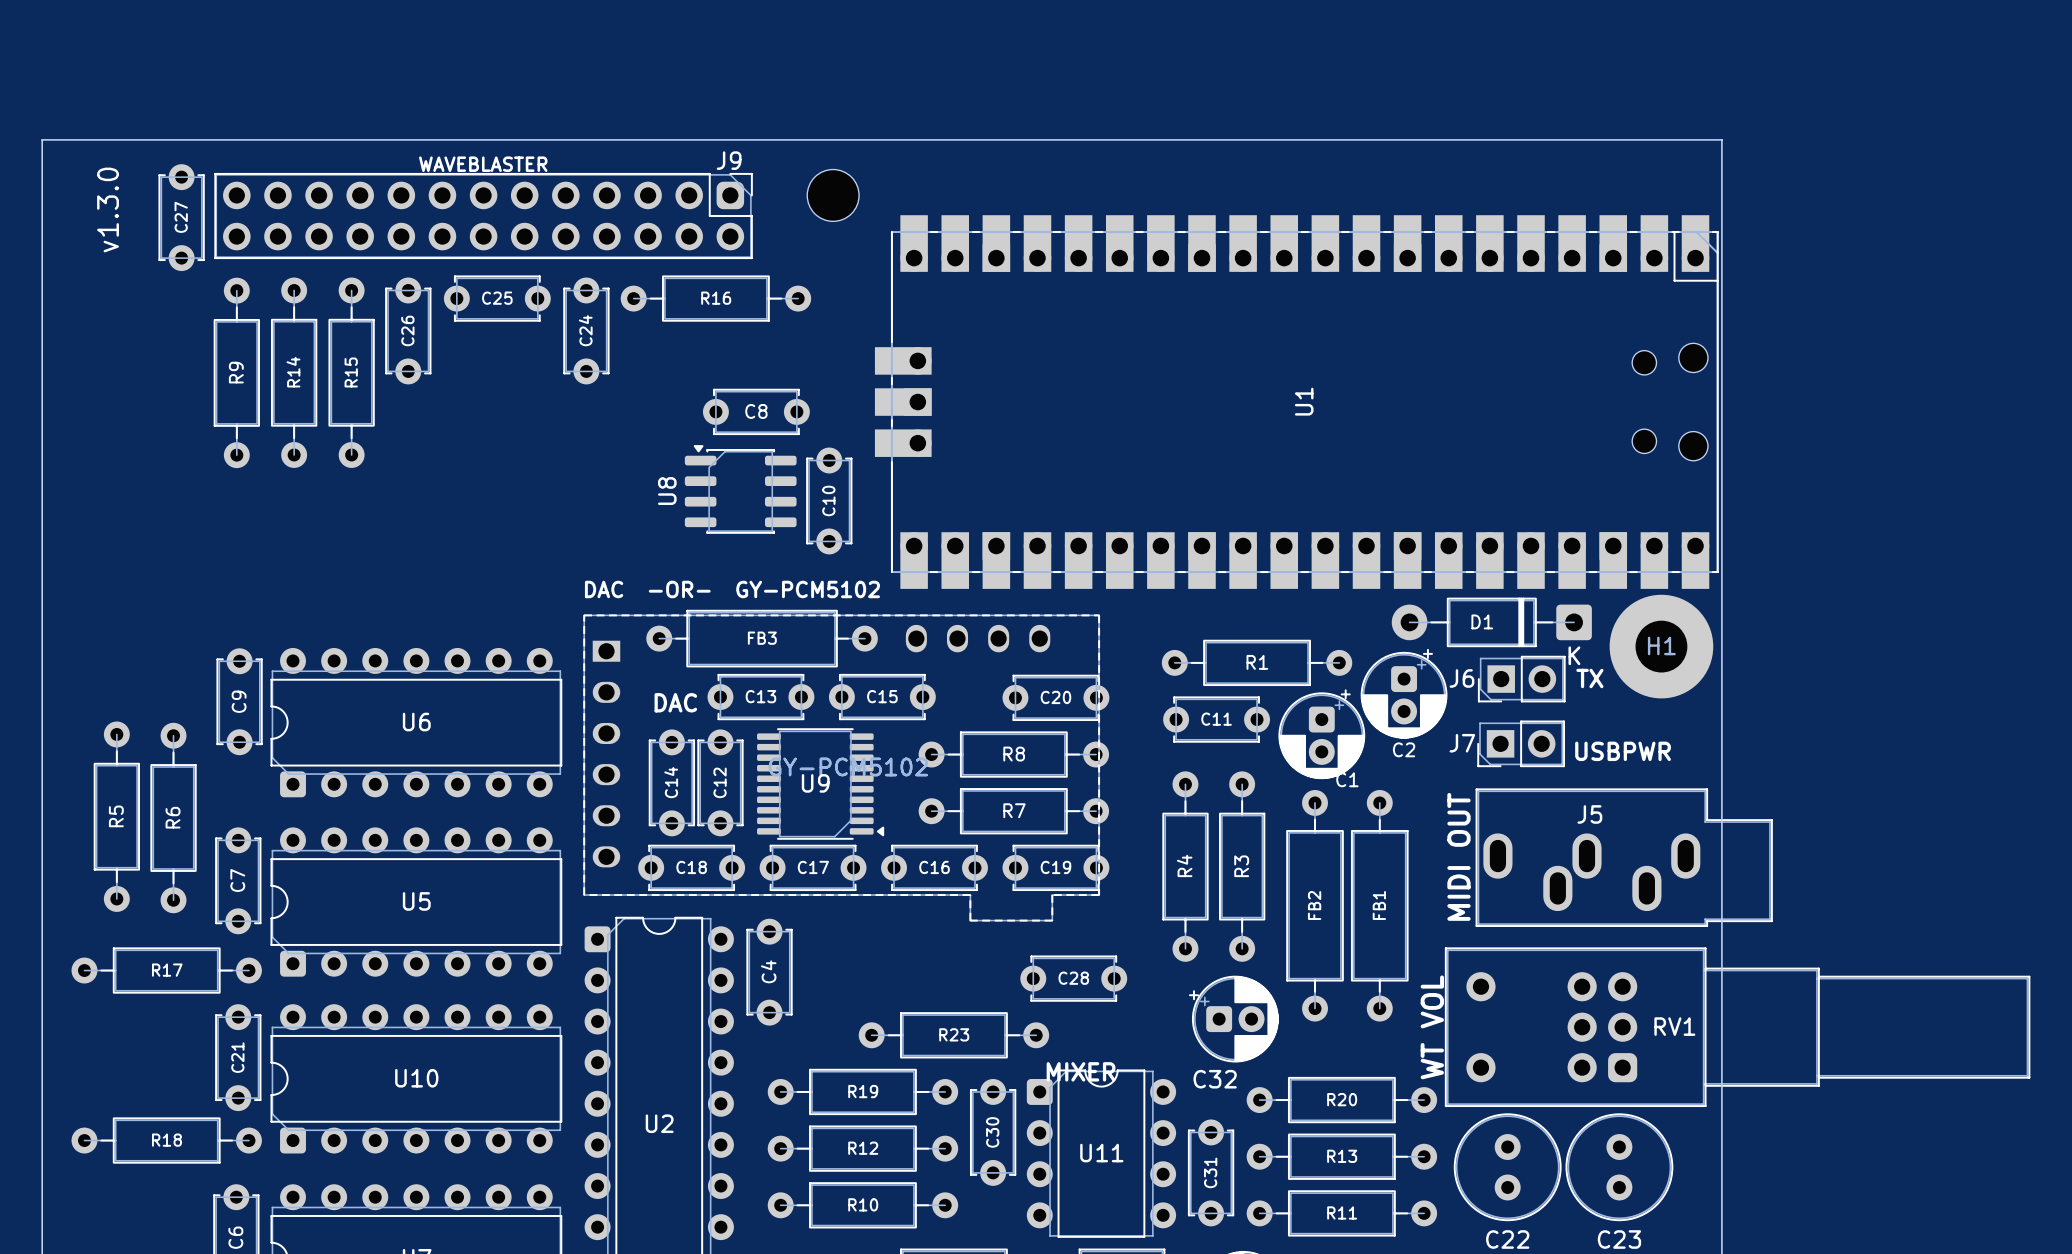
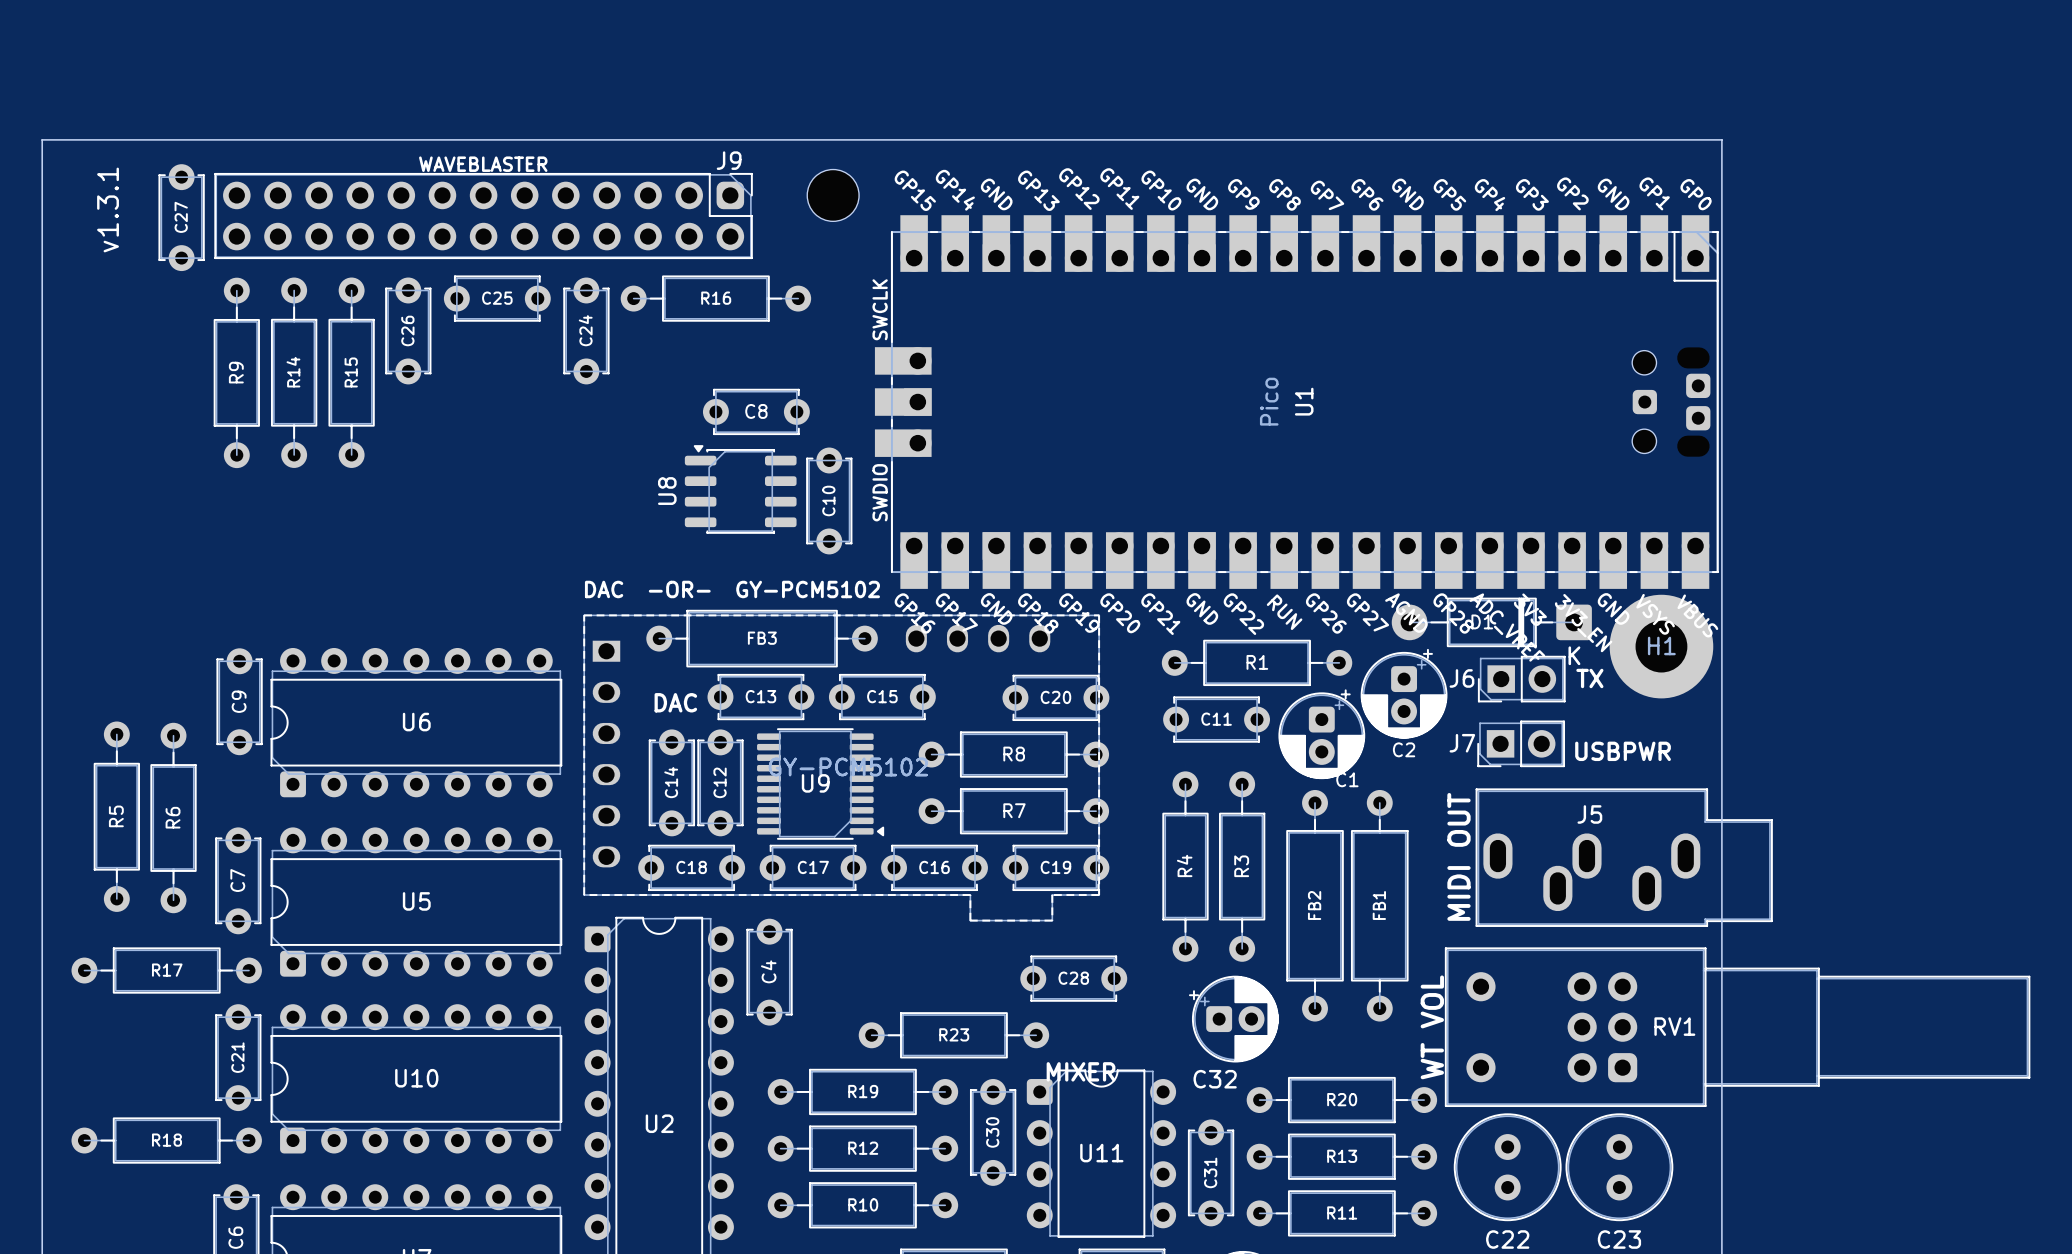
text: v1.3.0 (108, 209) -> v1.3.1 (108, 209)
U1 footprint: [874, 215, 1719, 589] -> [874, 215, 1719, 589]
U1 value: none -> Pico (1269, 401)

